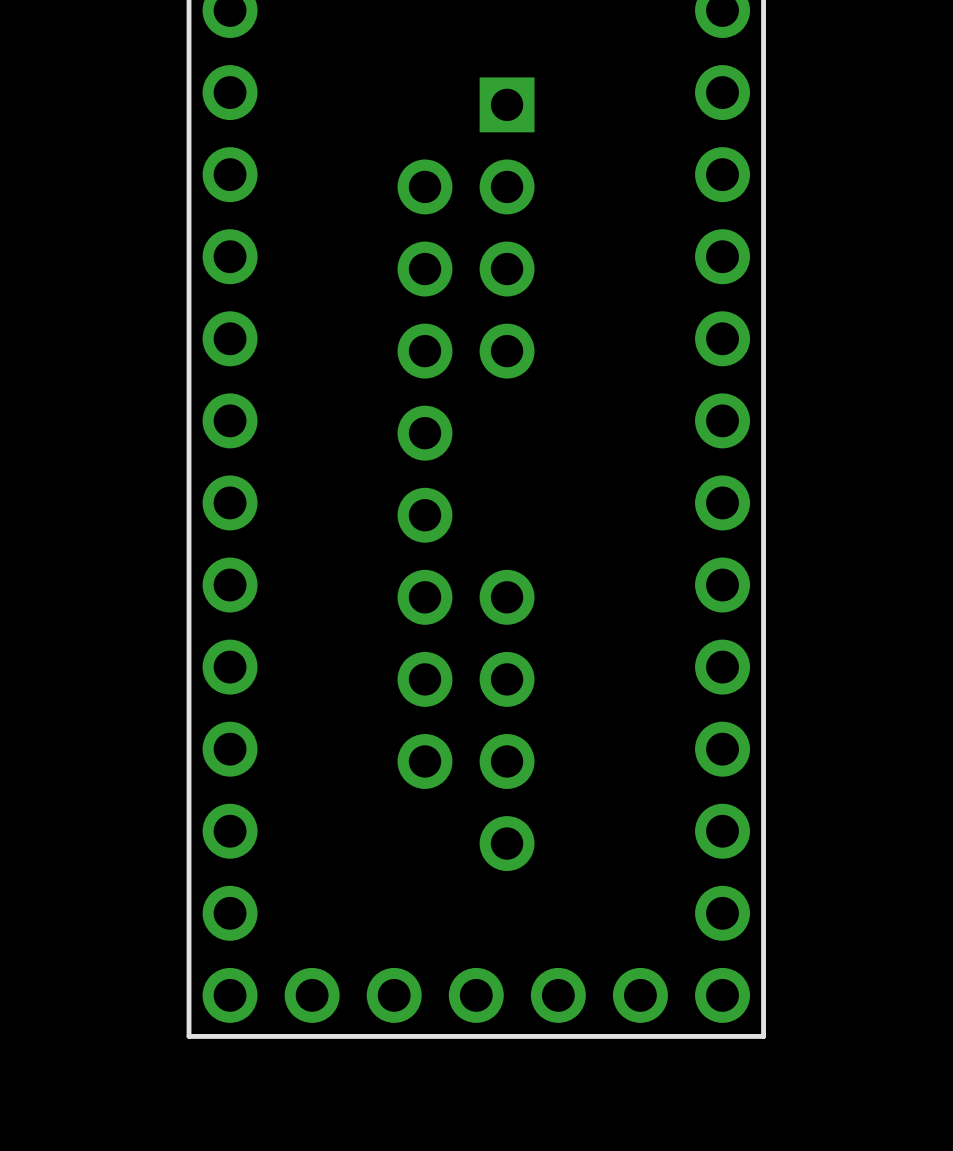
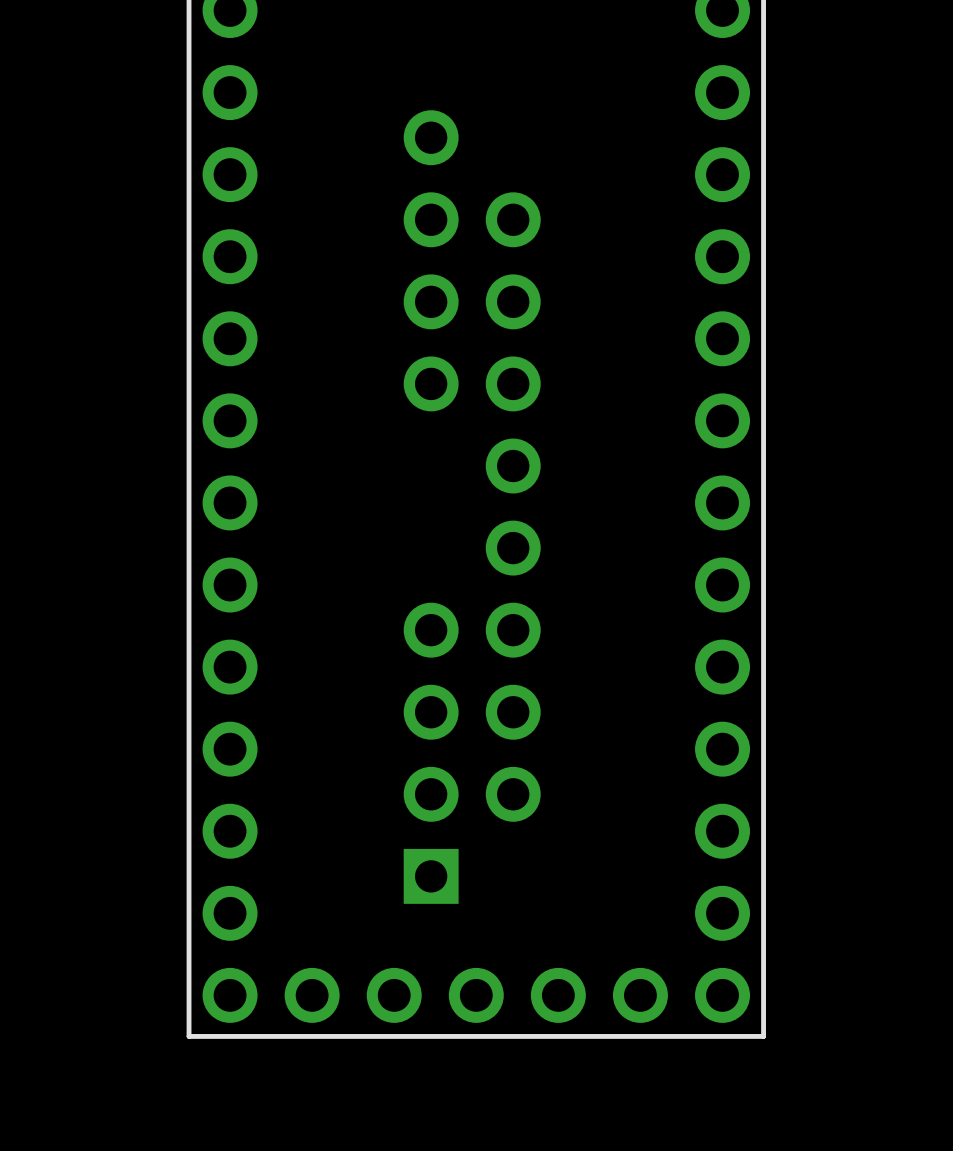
part rotation: 0° (466, 474) -> 180° (472, 507)

